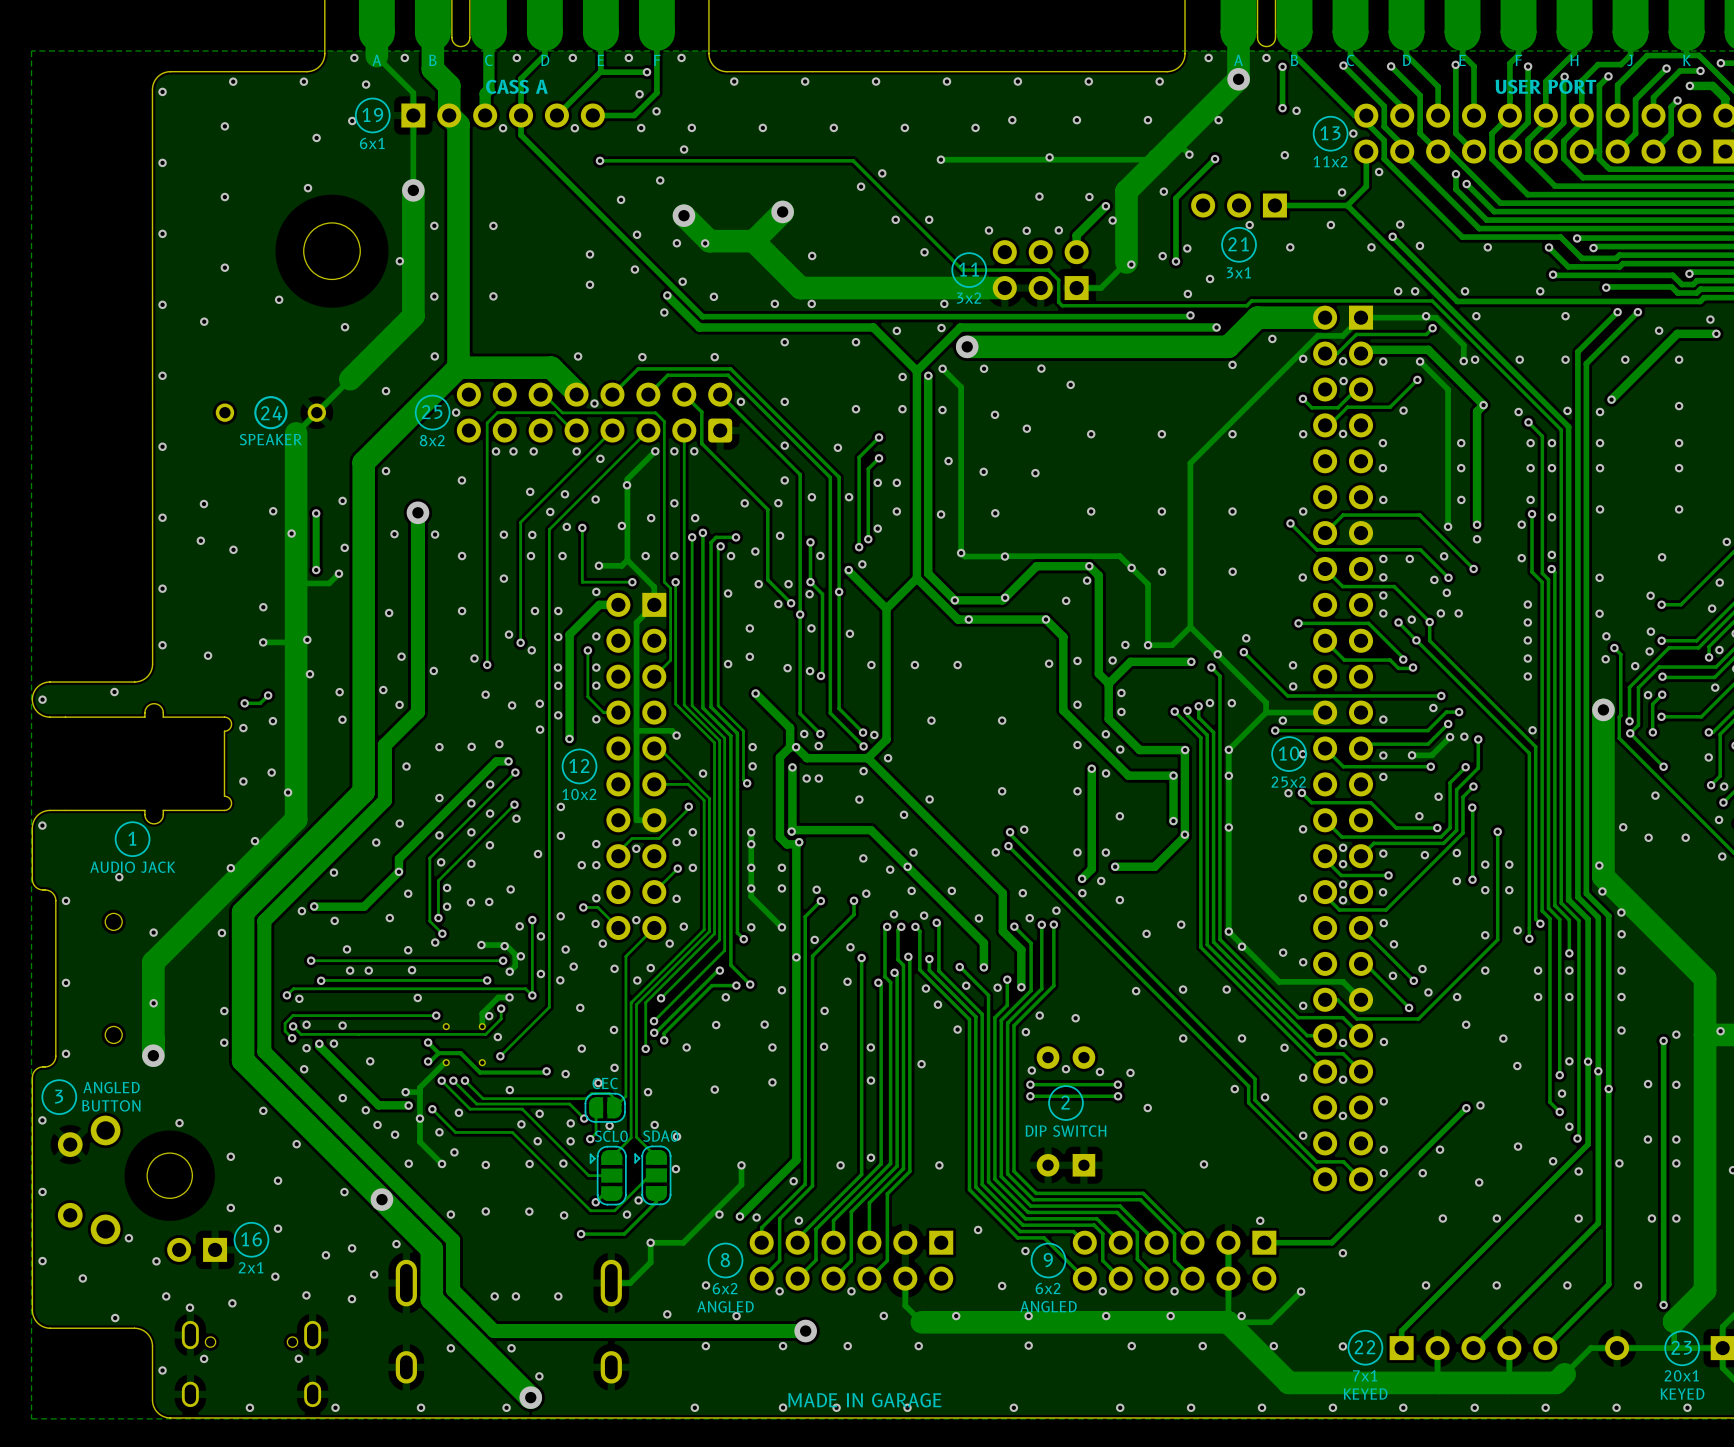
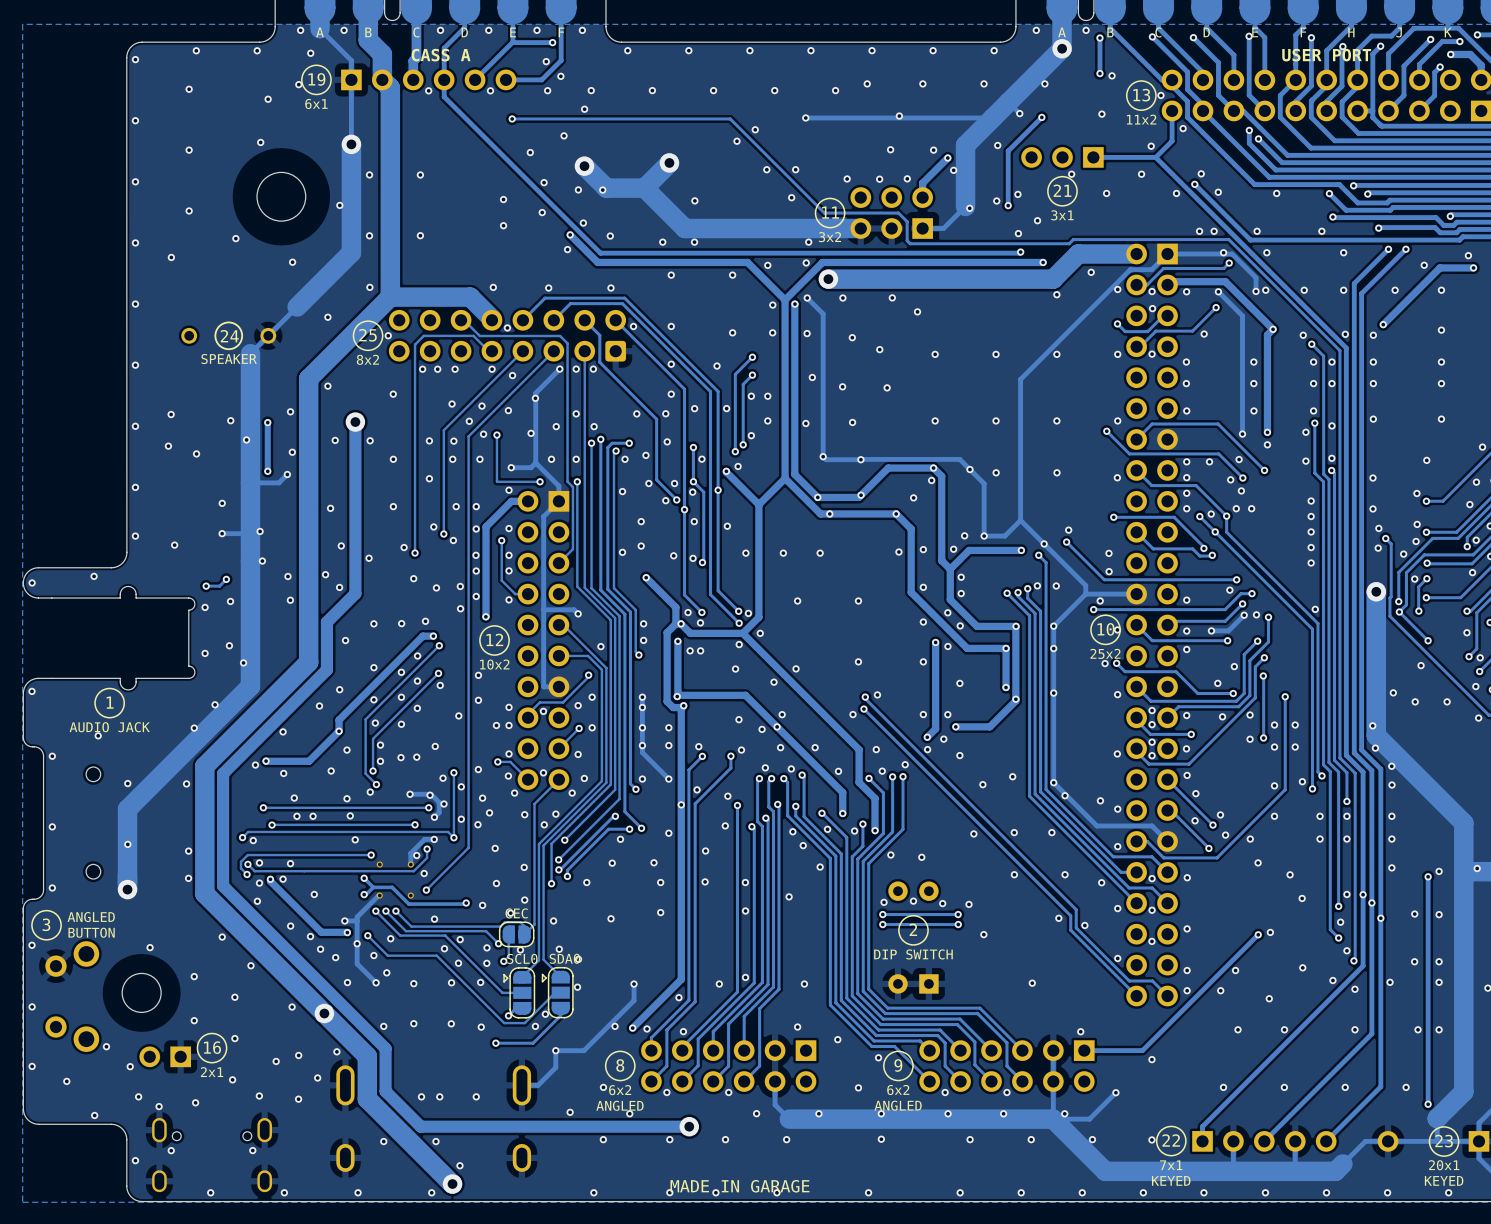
via: (1025, 1032) -> none
via: none -> (797, 1027)

